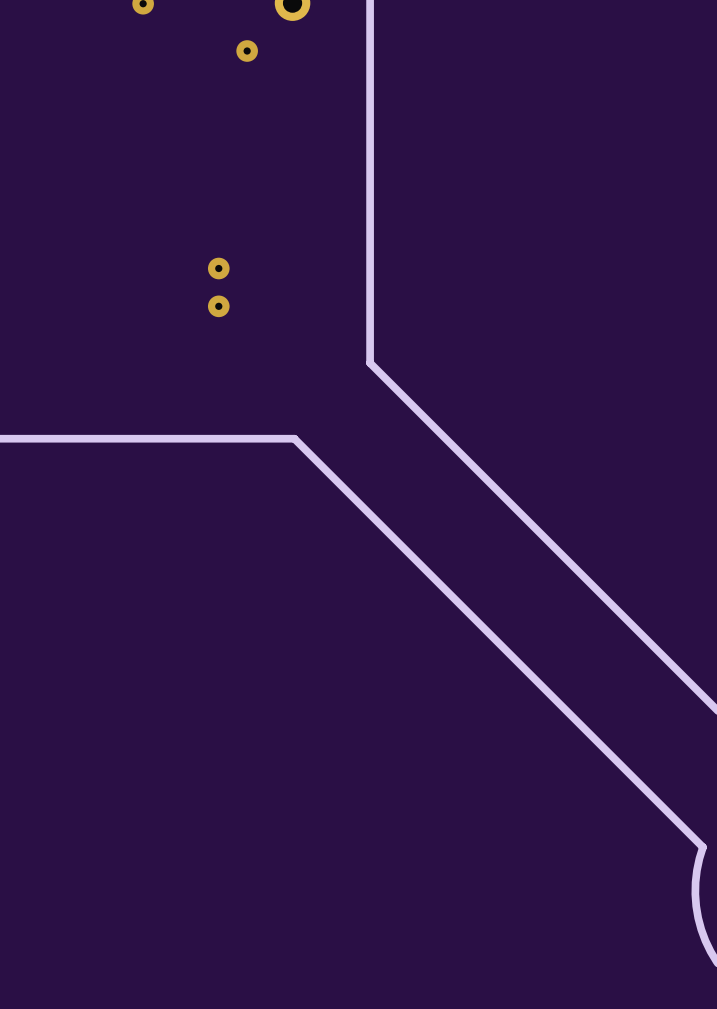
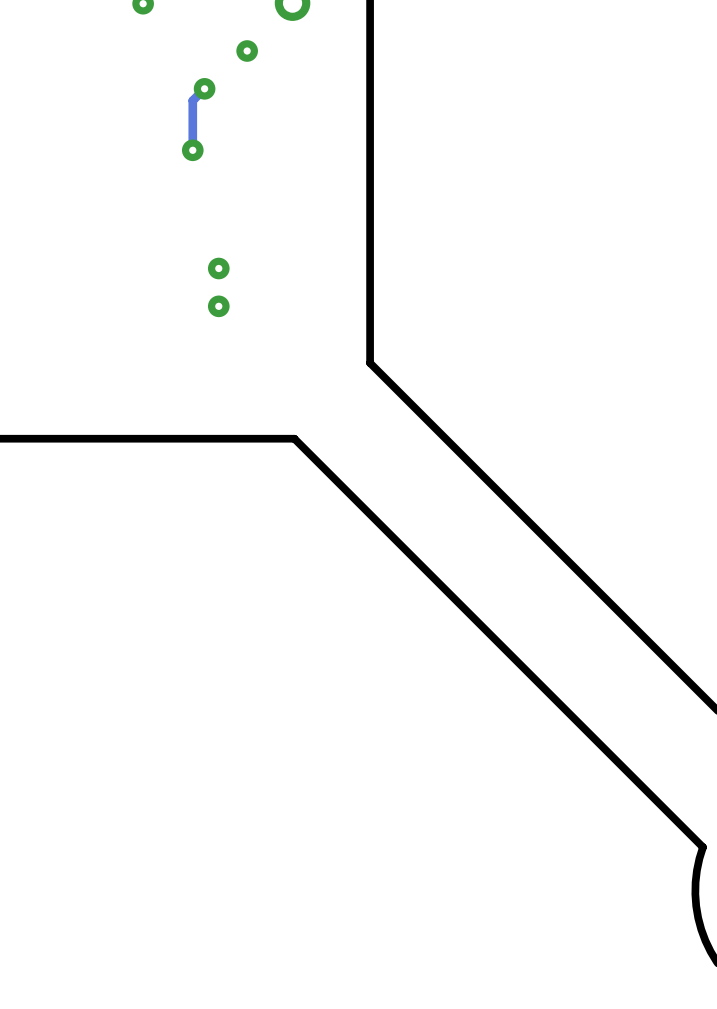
track: none -> (204, 88) (192, 100) (192, 150)
via: none -> (204, 88)
via: none -> (192, 150)

